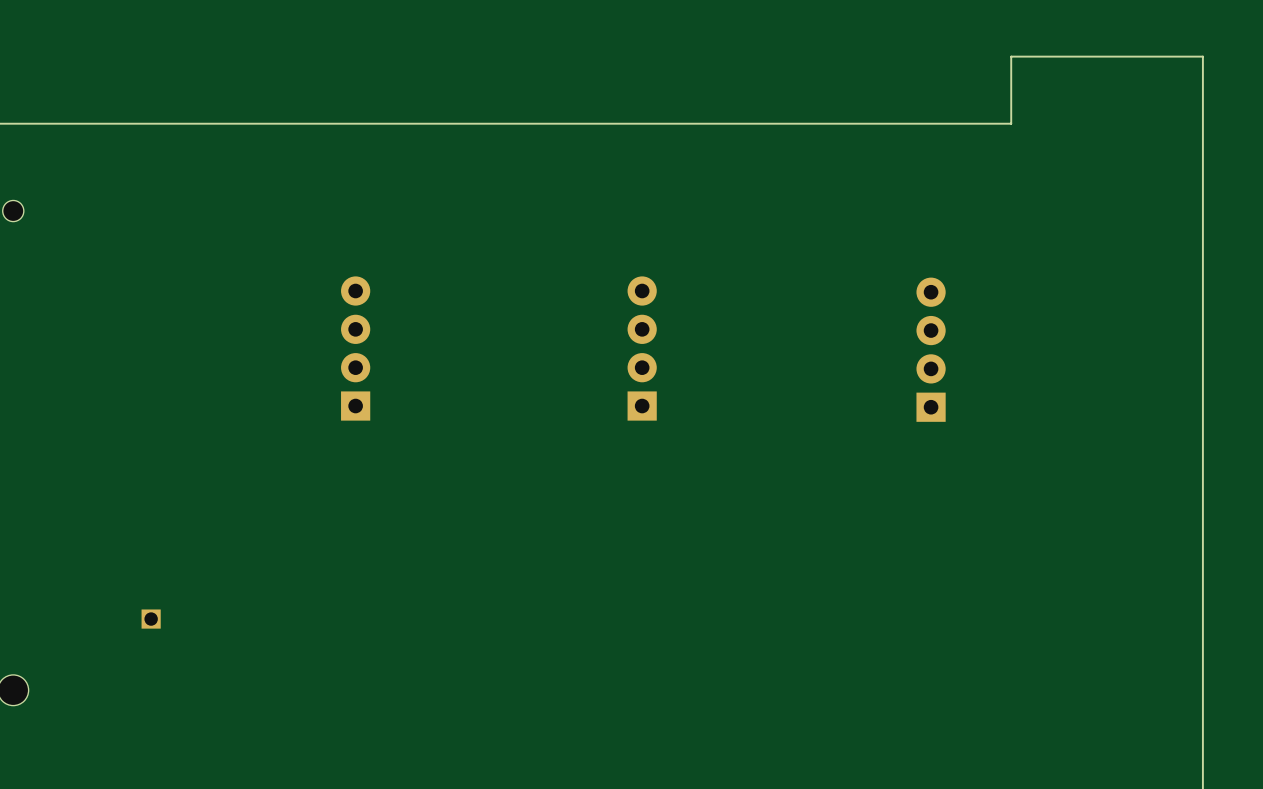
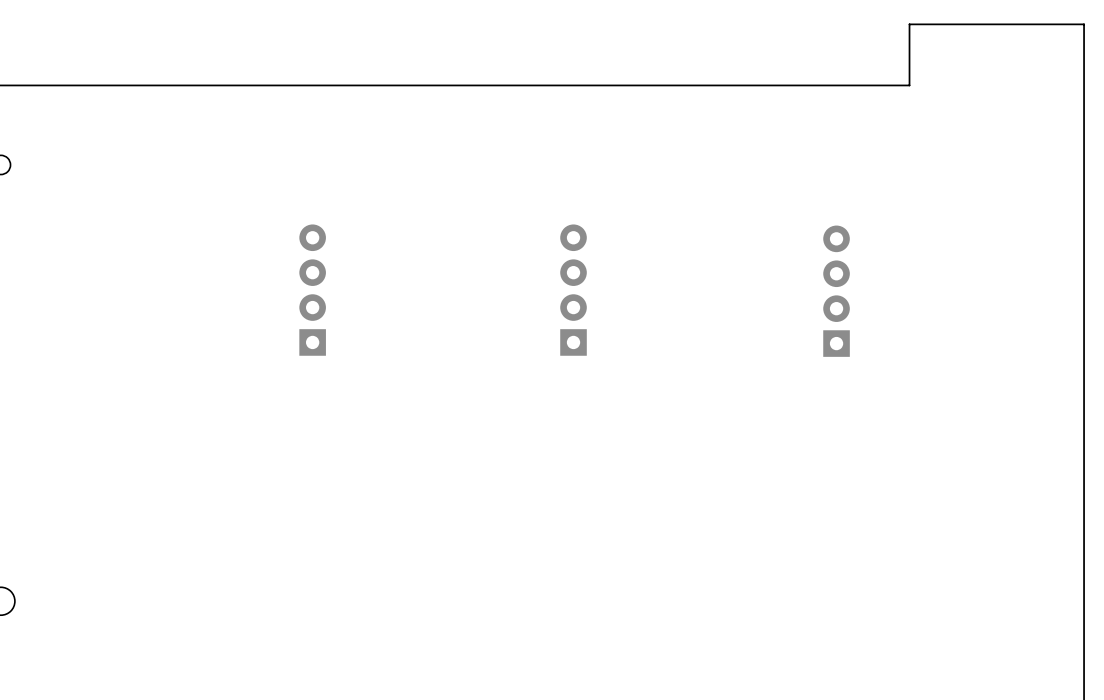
part: (151, 619) -> none

